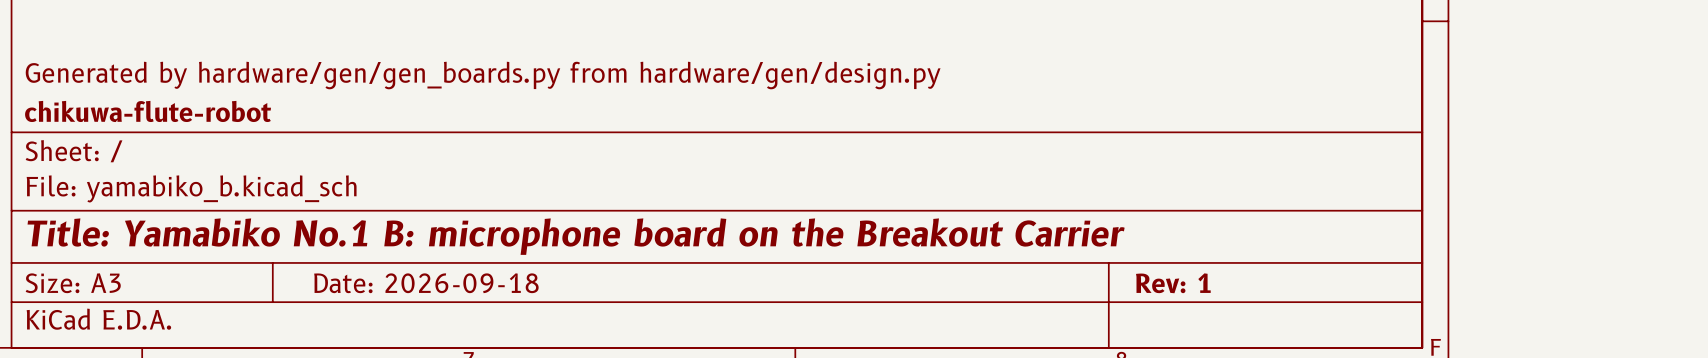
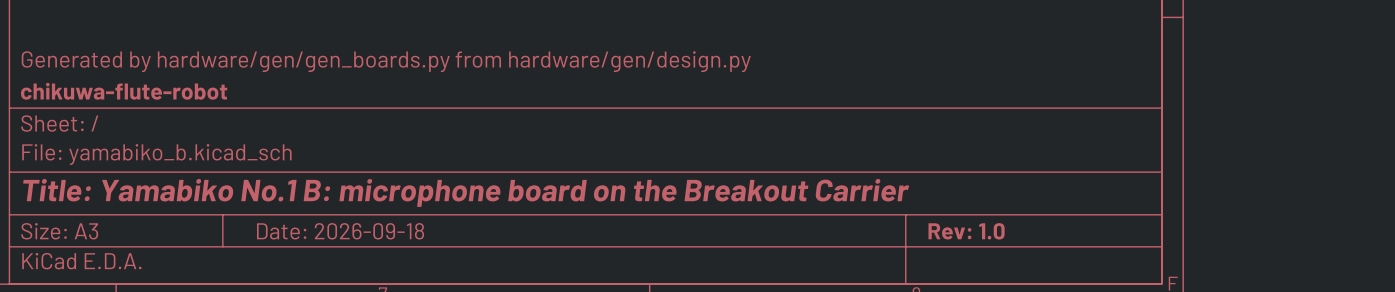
title block: Rev: 1 (1173, 283) -> Rev: 1.0 (966, 231)

